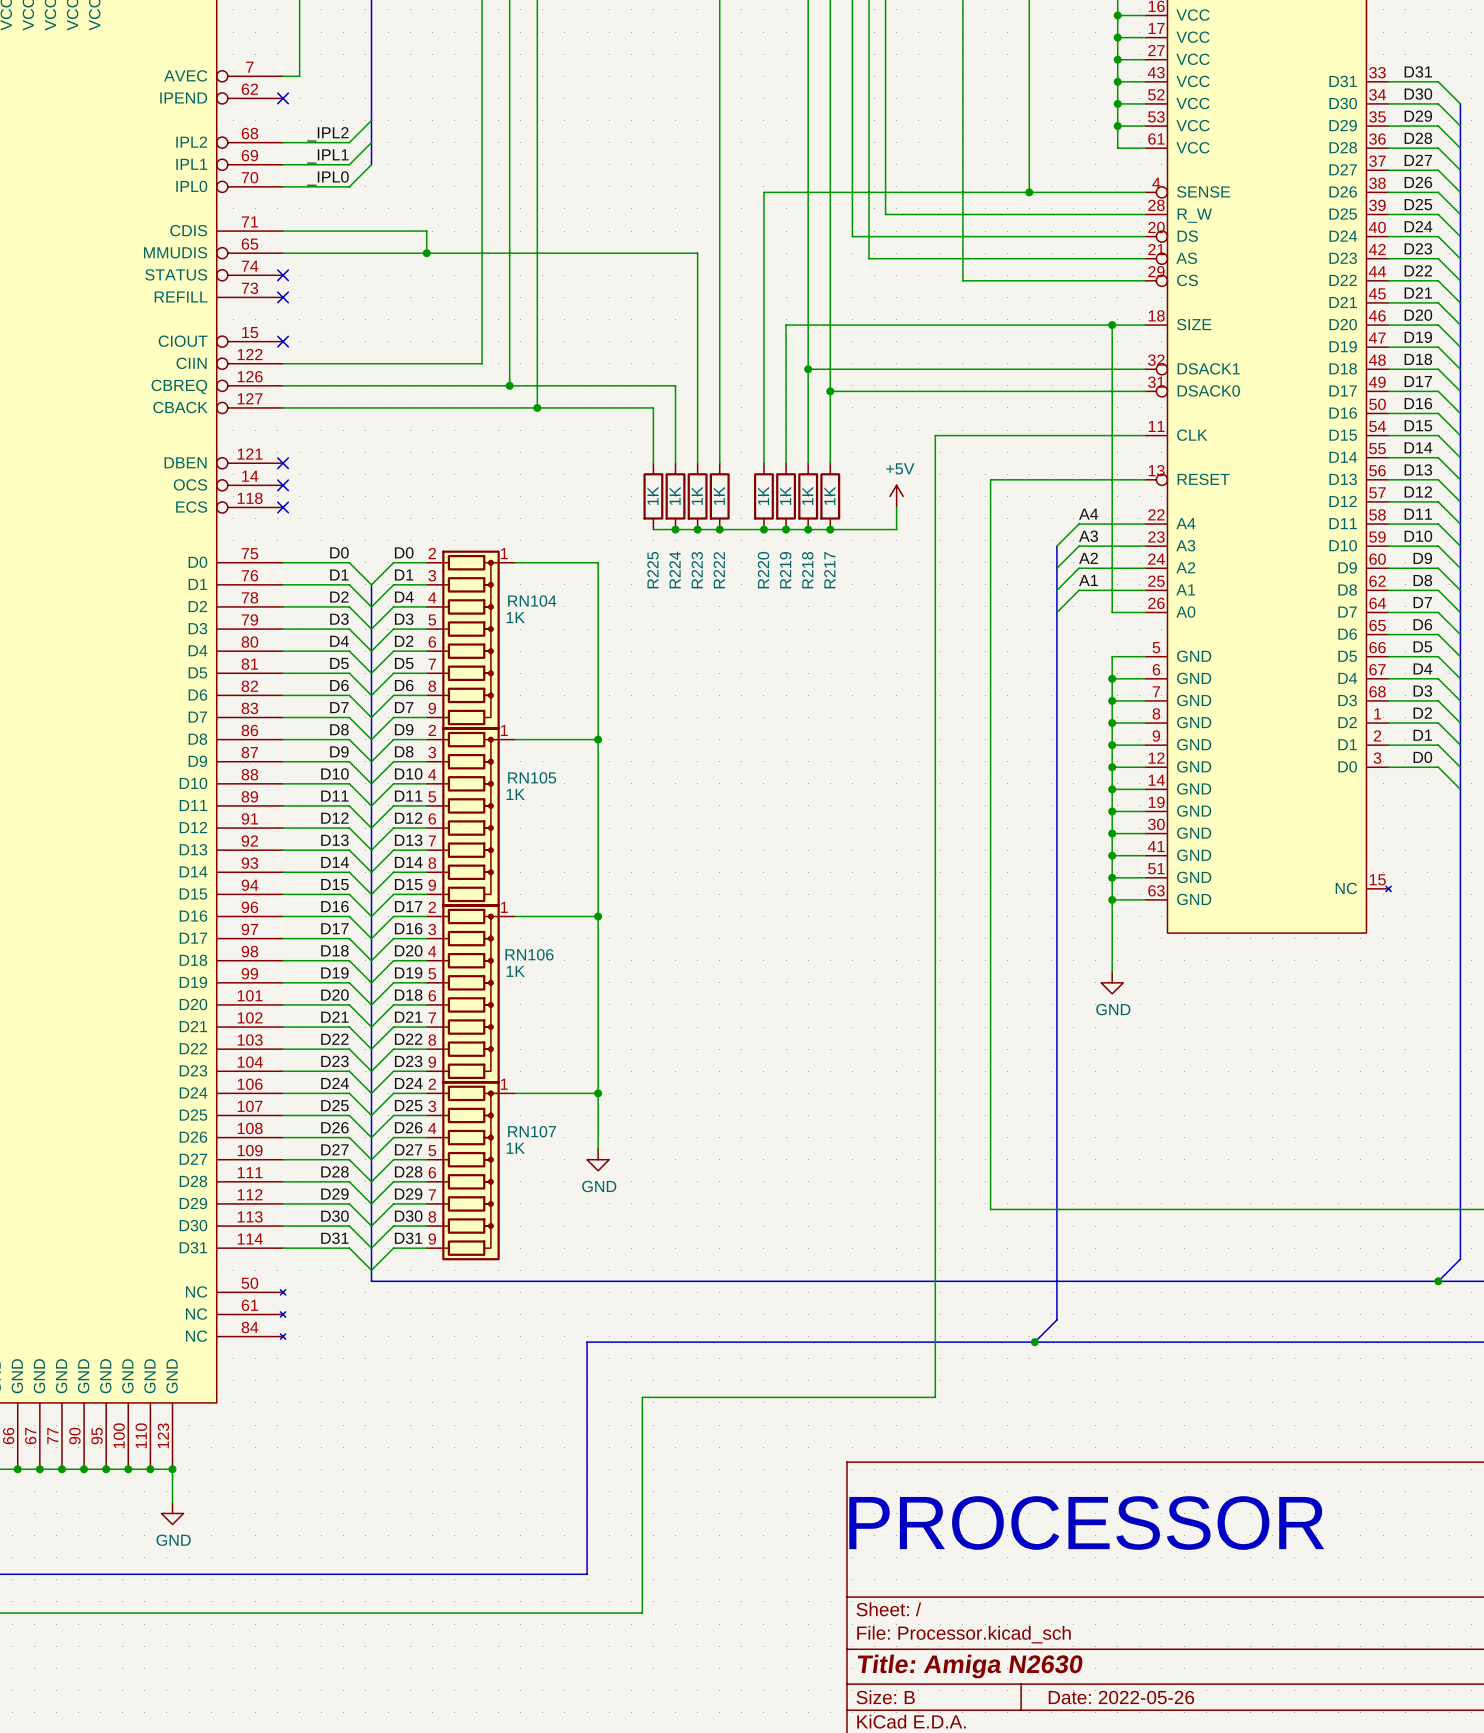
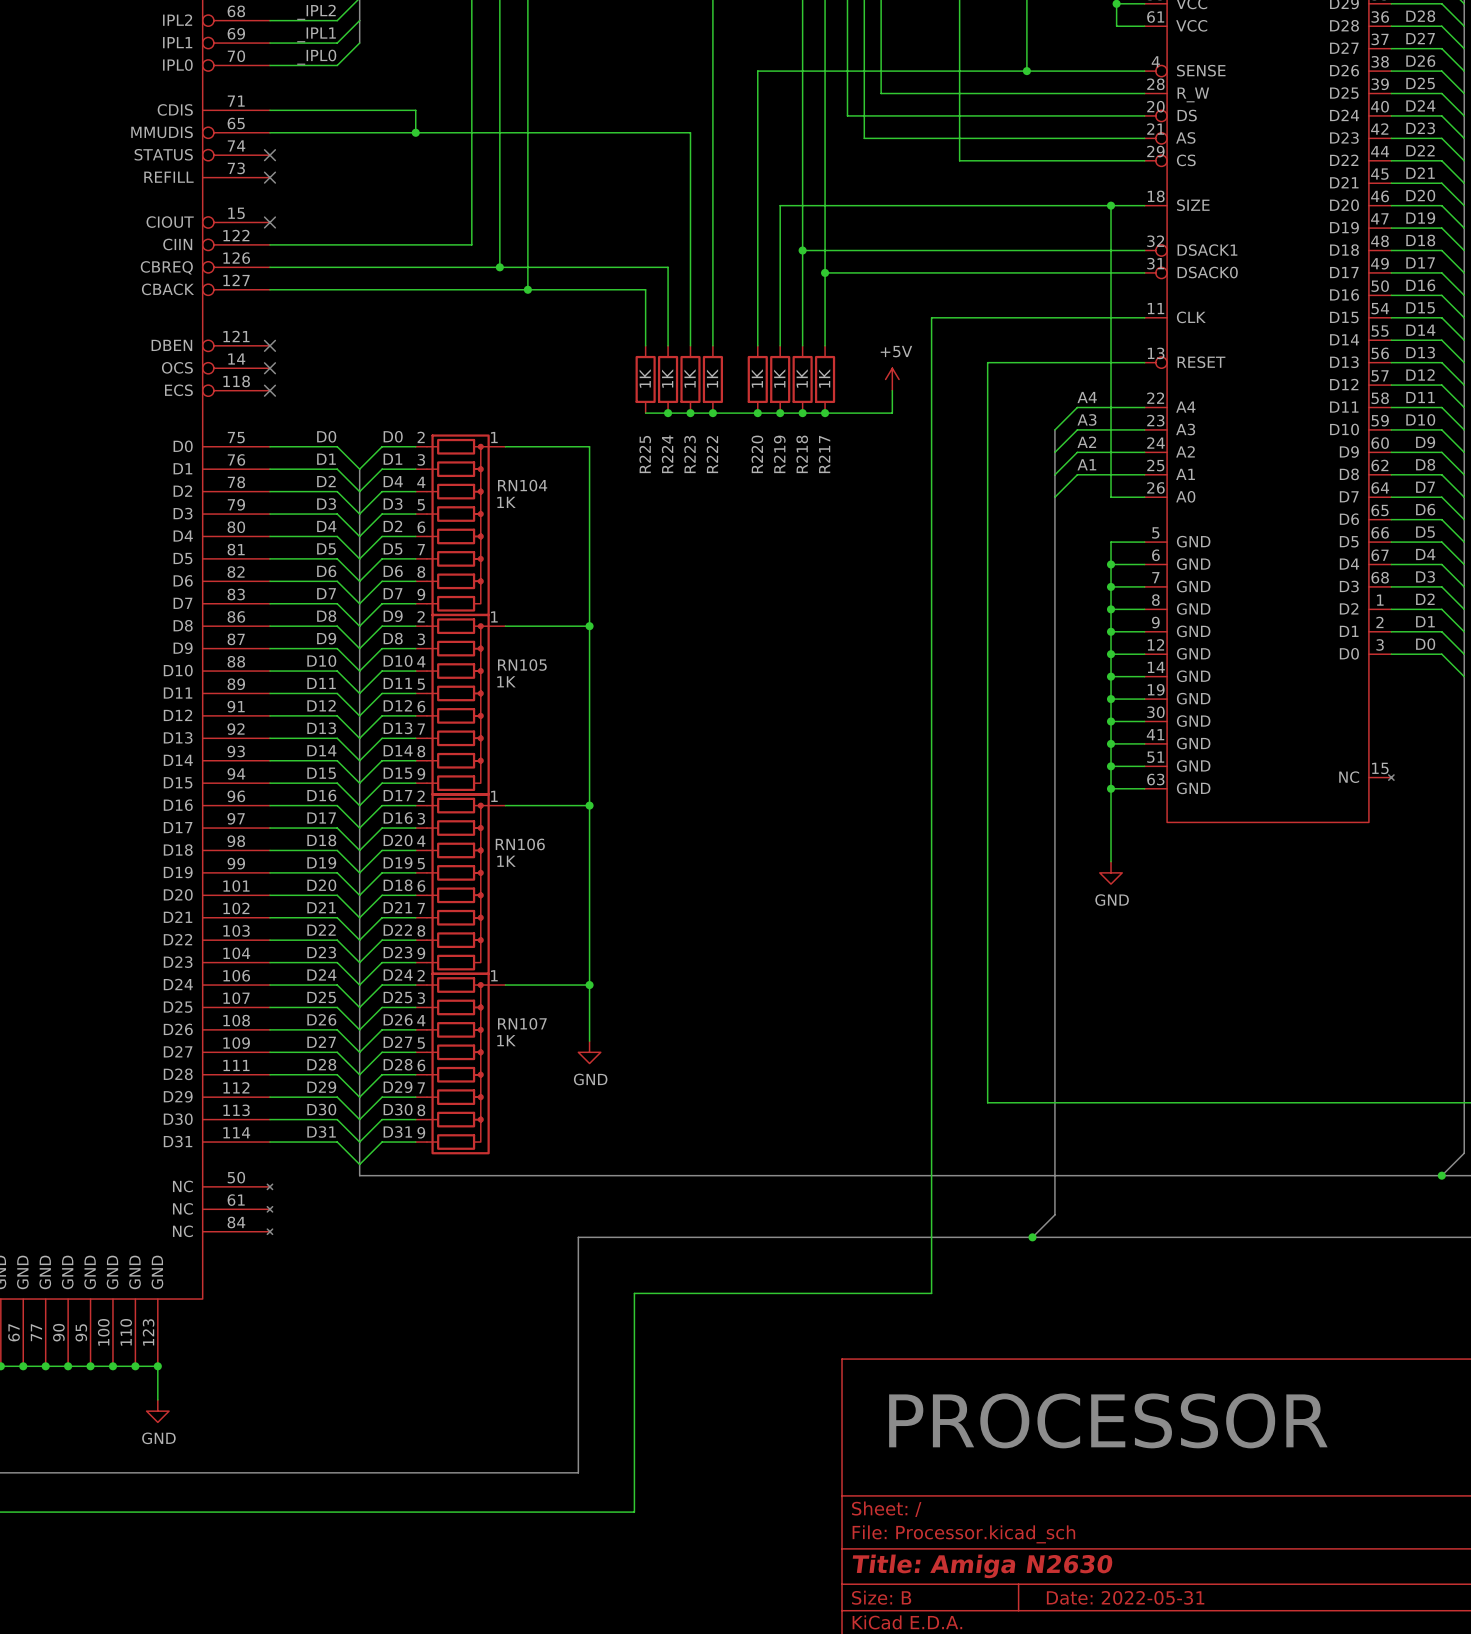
title block: Date: 2022-05-26 (1121, 1697) -> Date: 2022-05-31 (1125, 1597)

